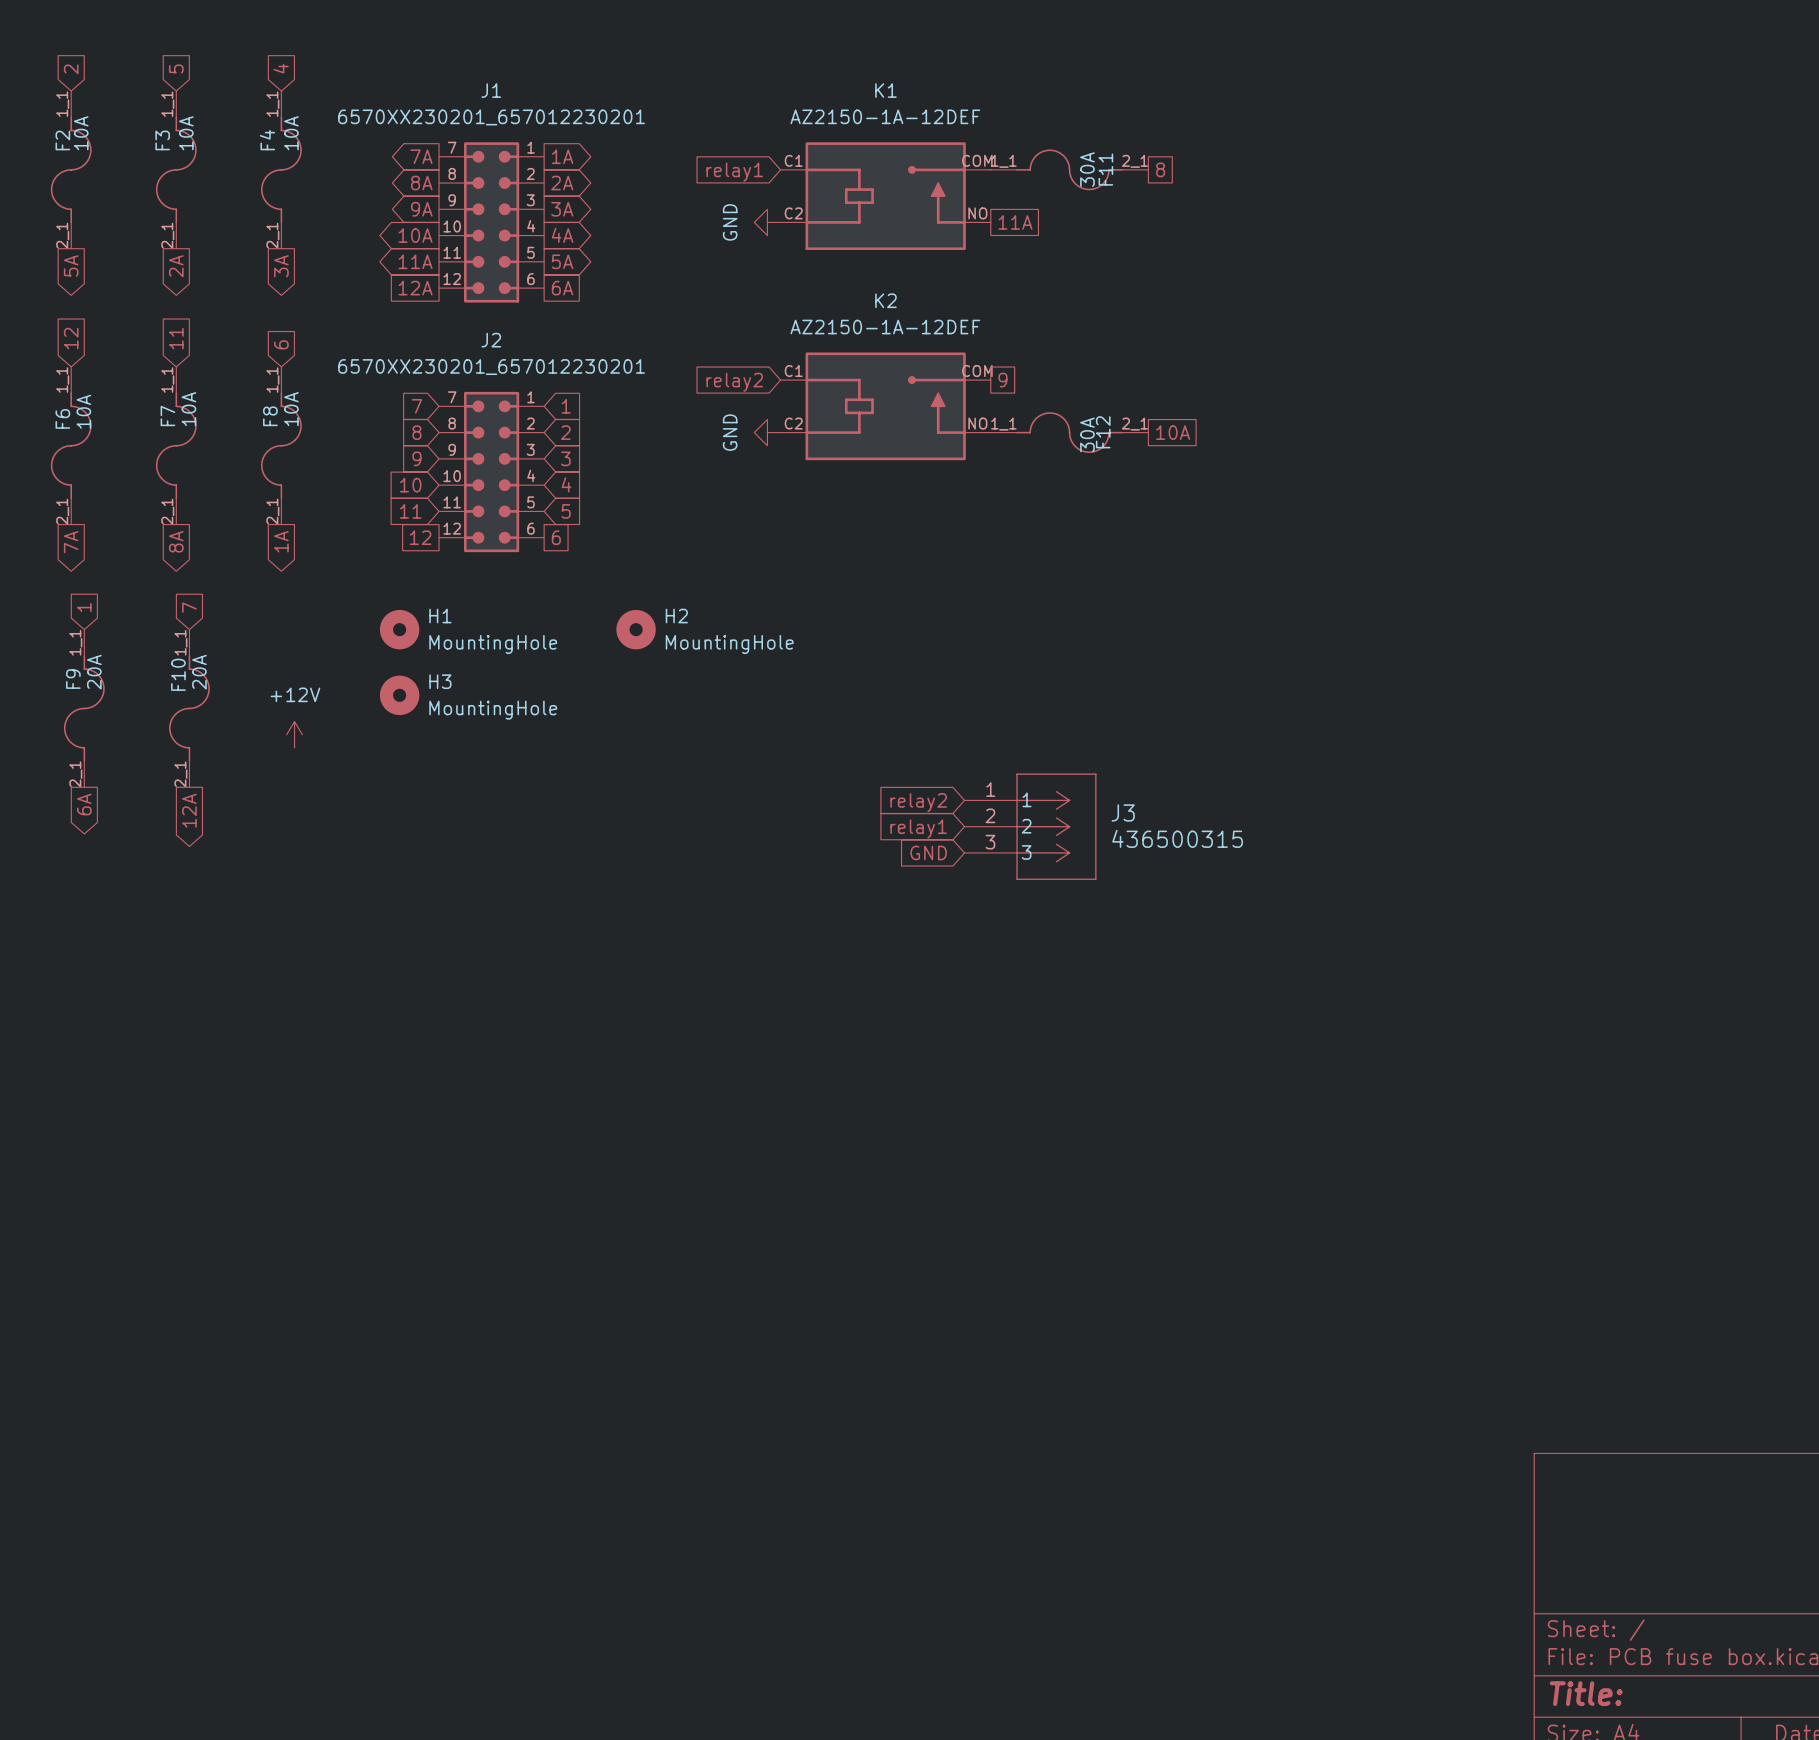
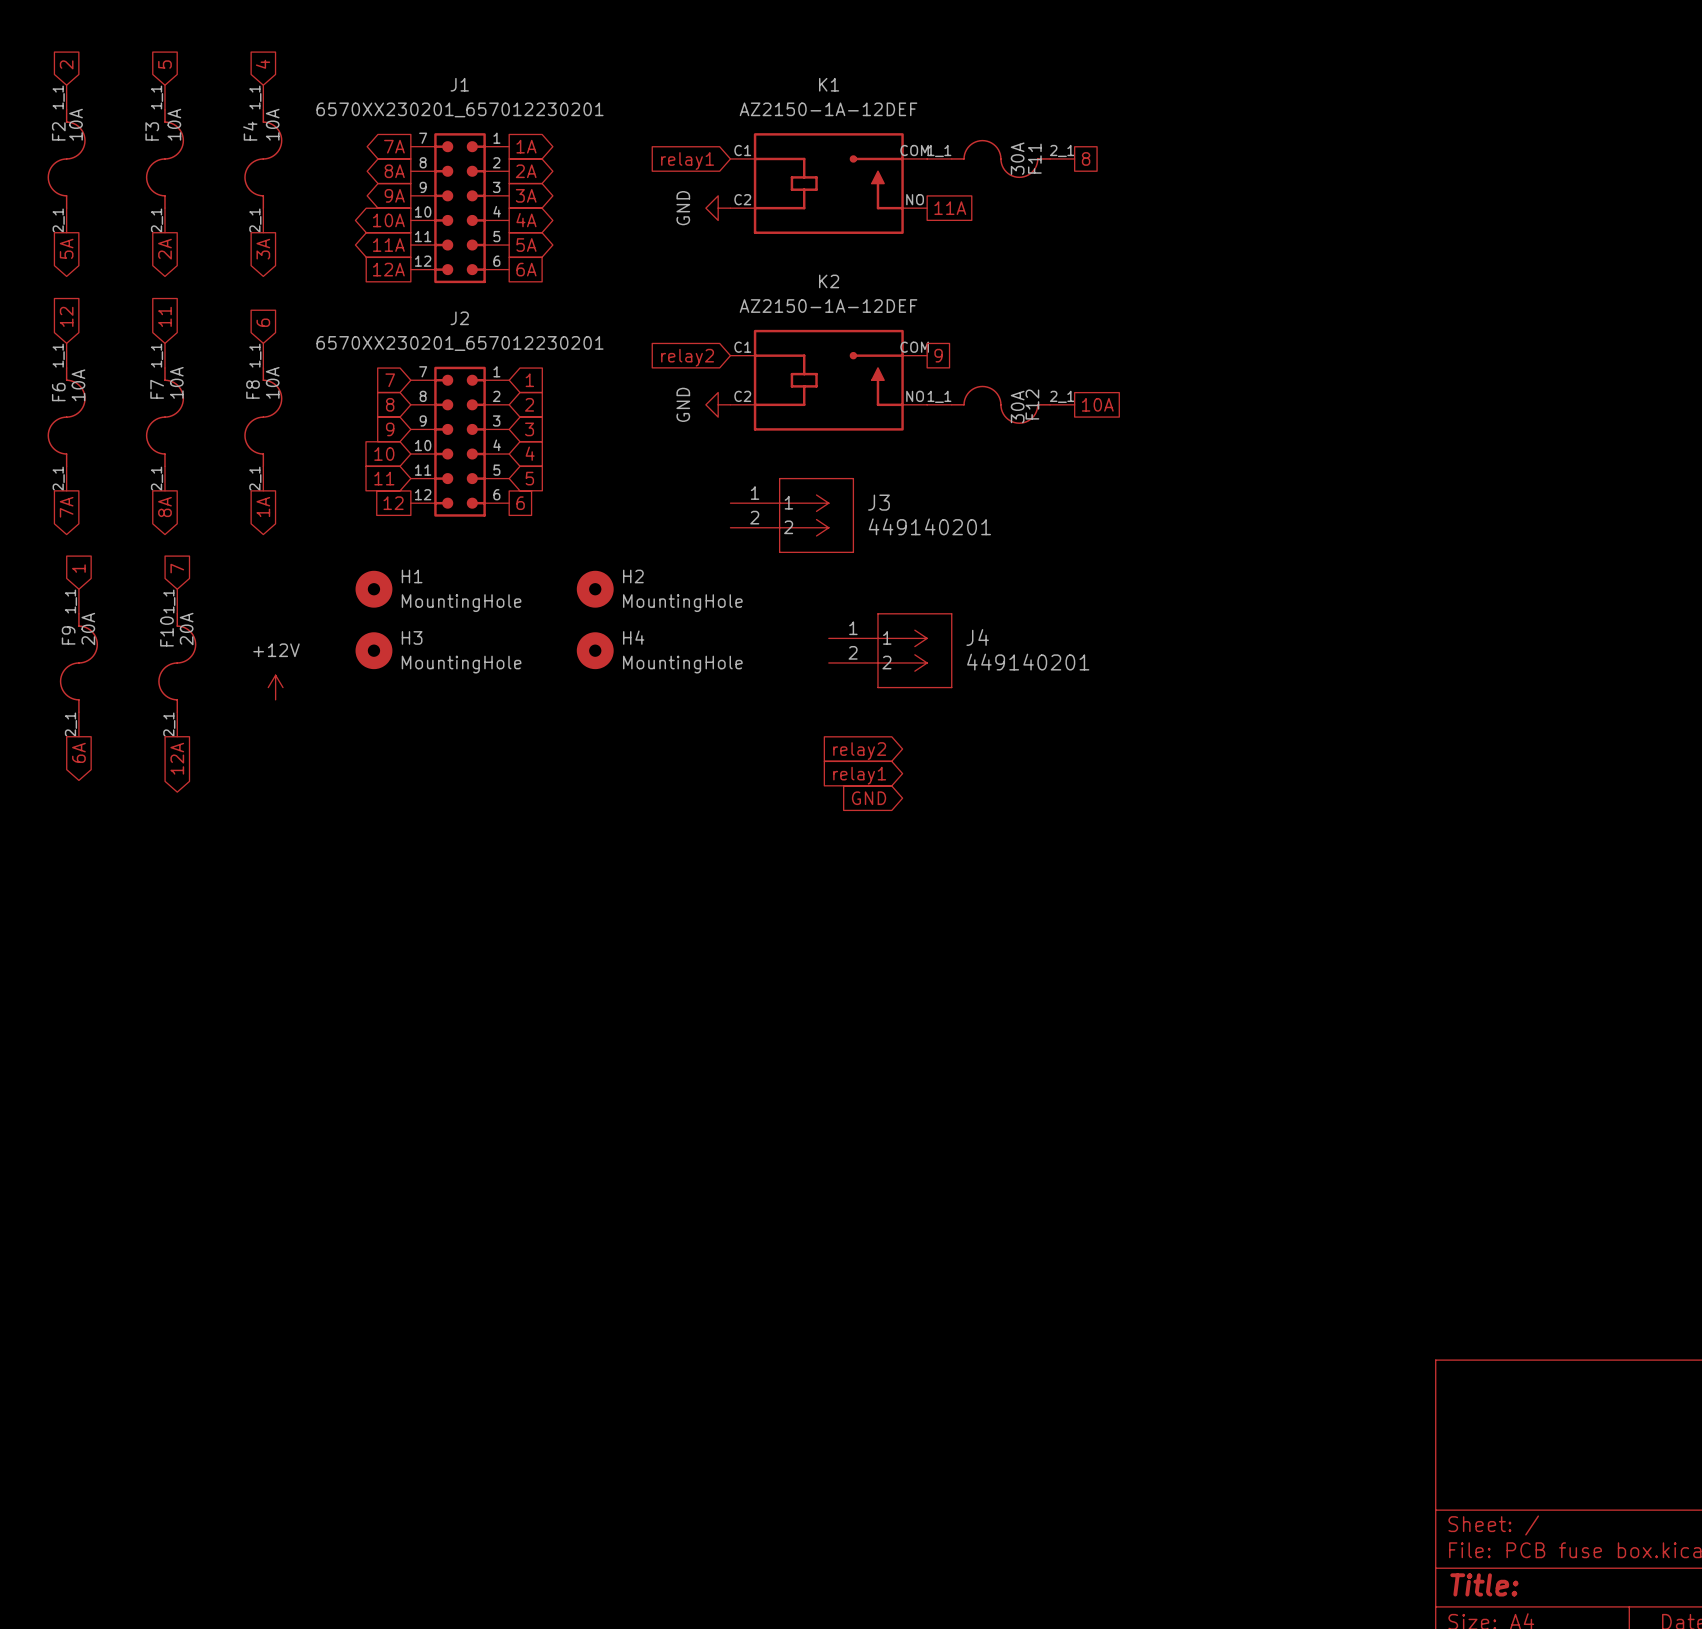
H4: none -> MountingHole (595, 650)
J4: none -> 449140201 (890, 650)
J3 symbol: [964, 773, 1097, 880] -> [730, 477, 855, 553]
J3 value: 436500315 (1177, 838) -> 449140201 (929, 526)

